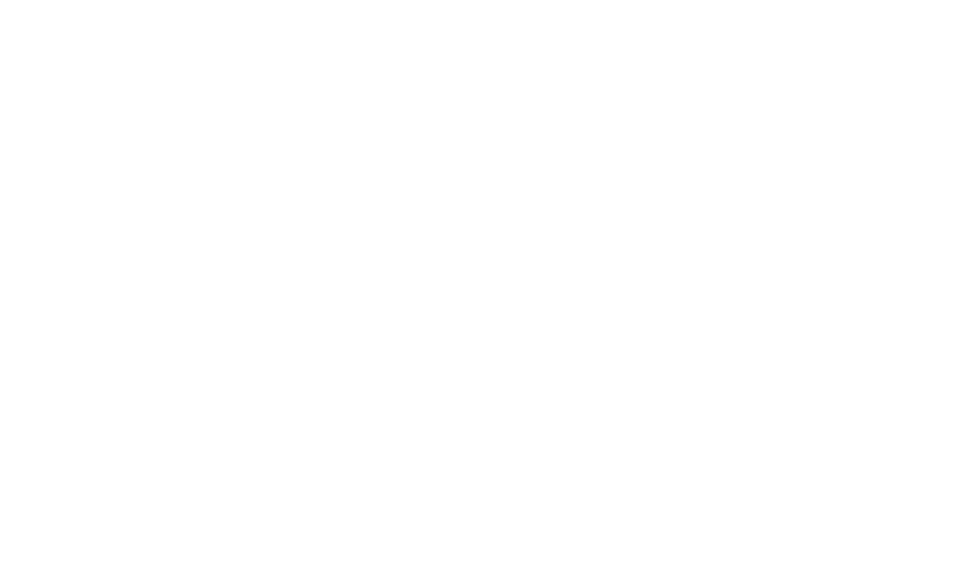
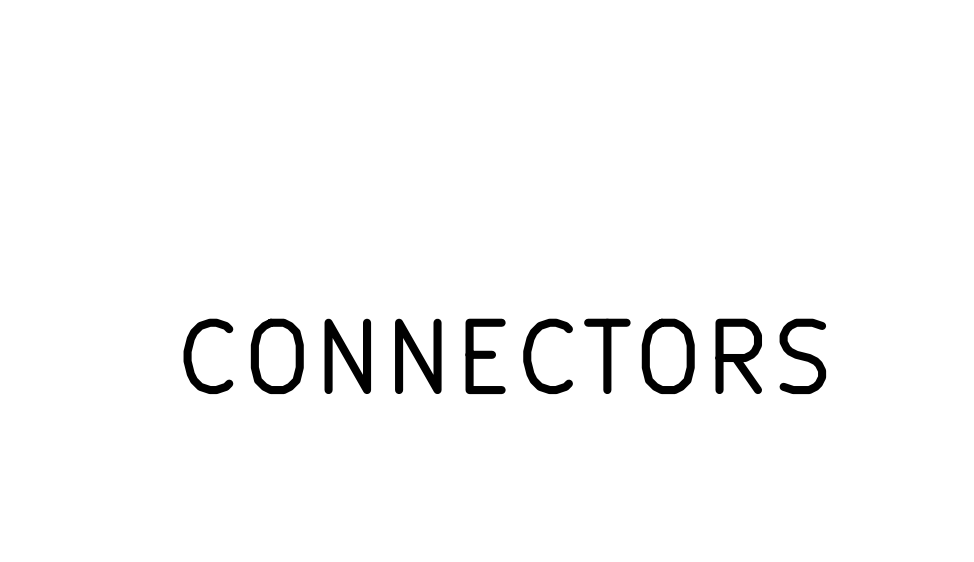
text: none -> CONNECTORS (504, 356)

